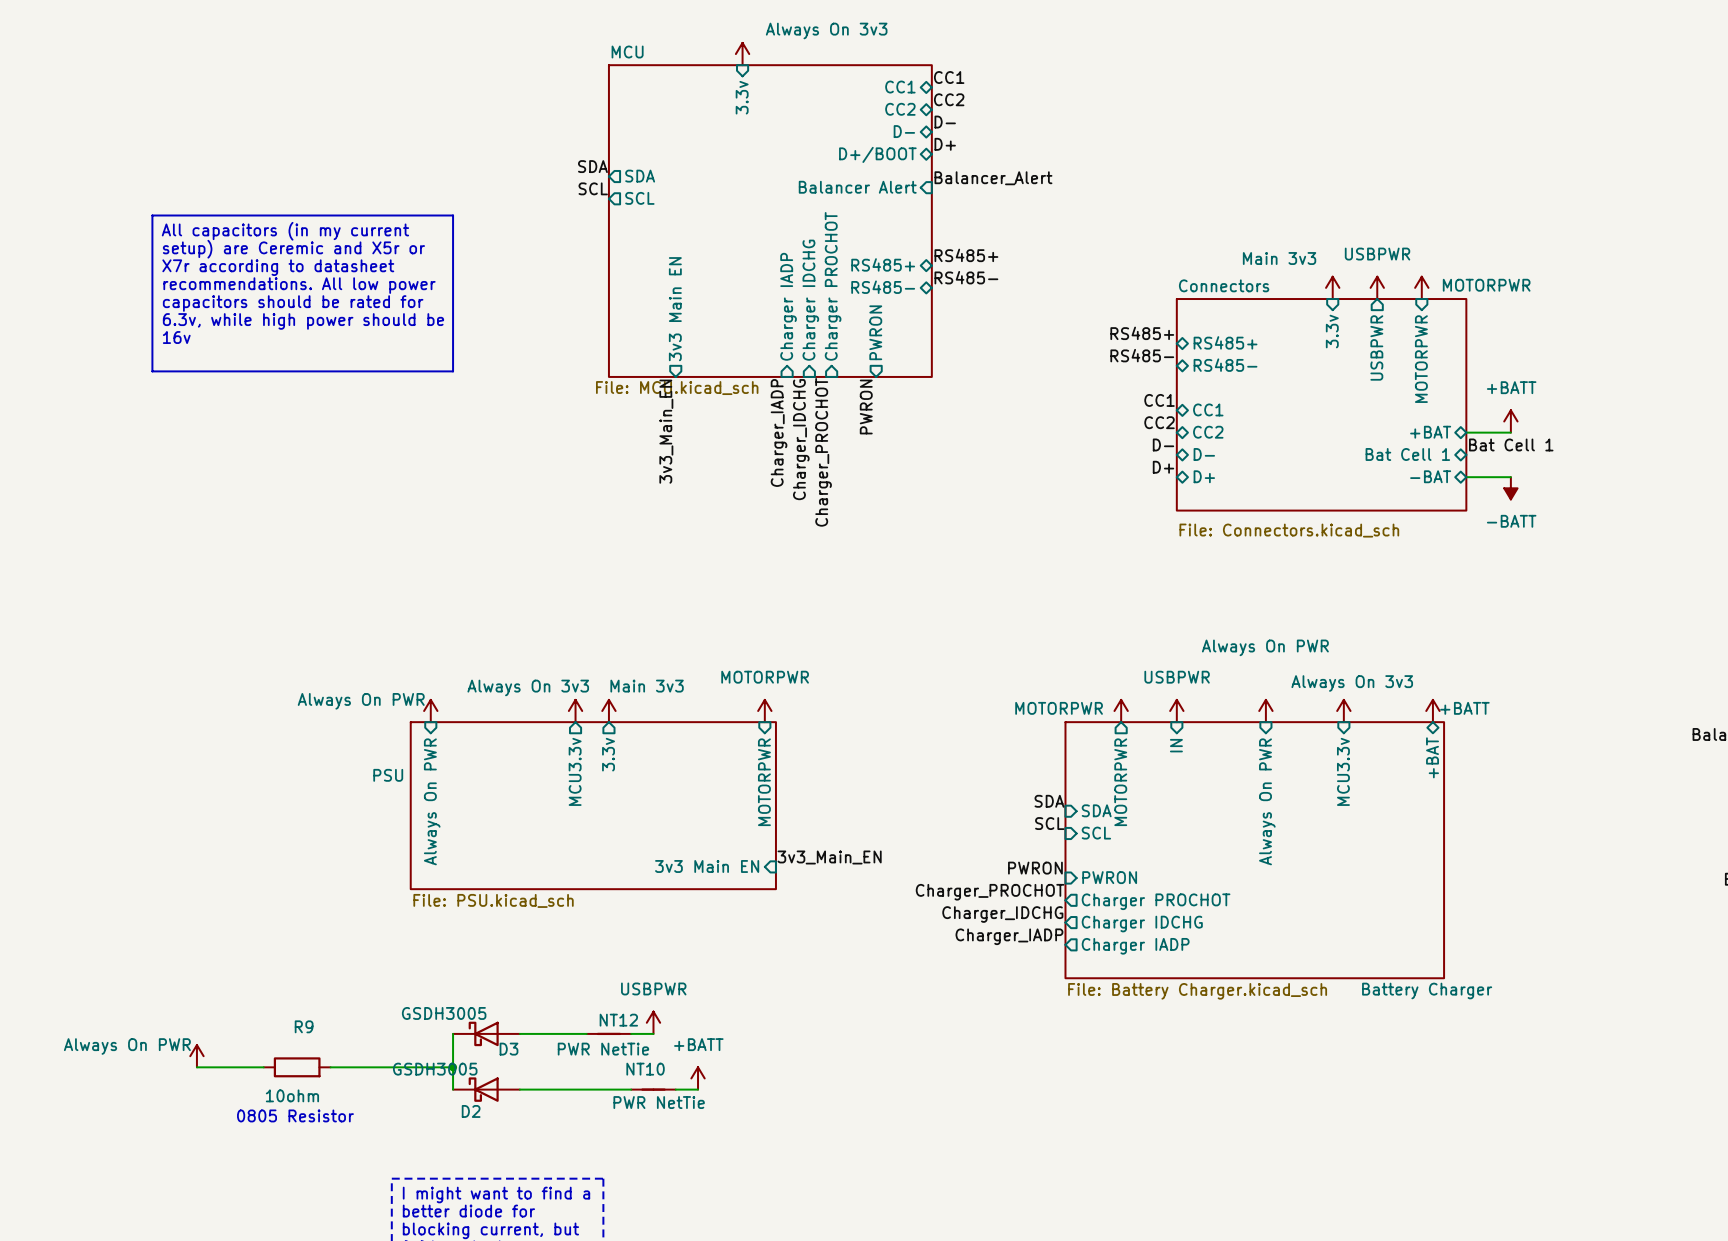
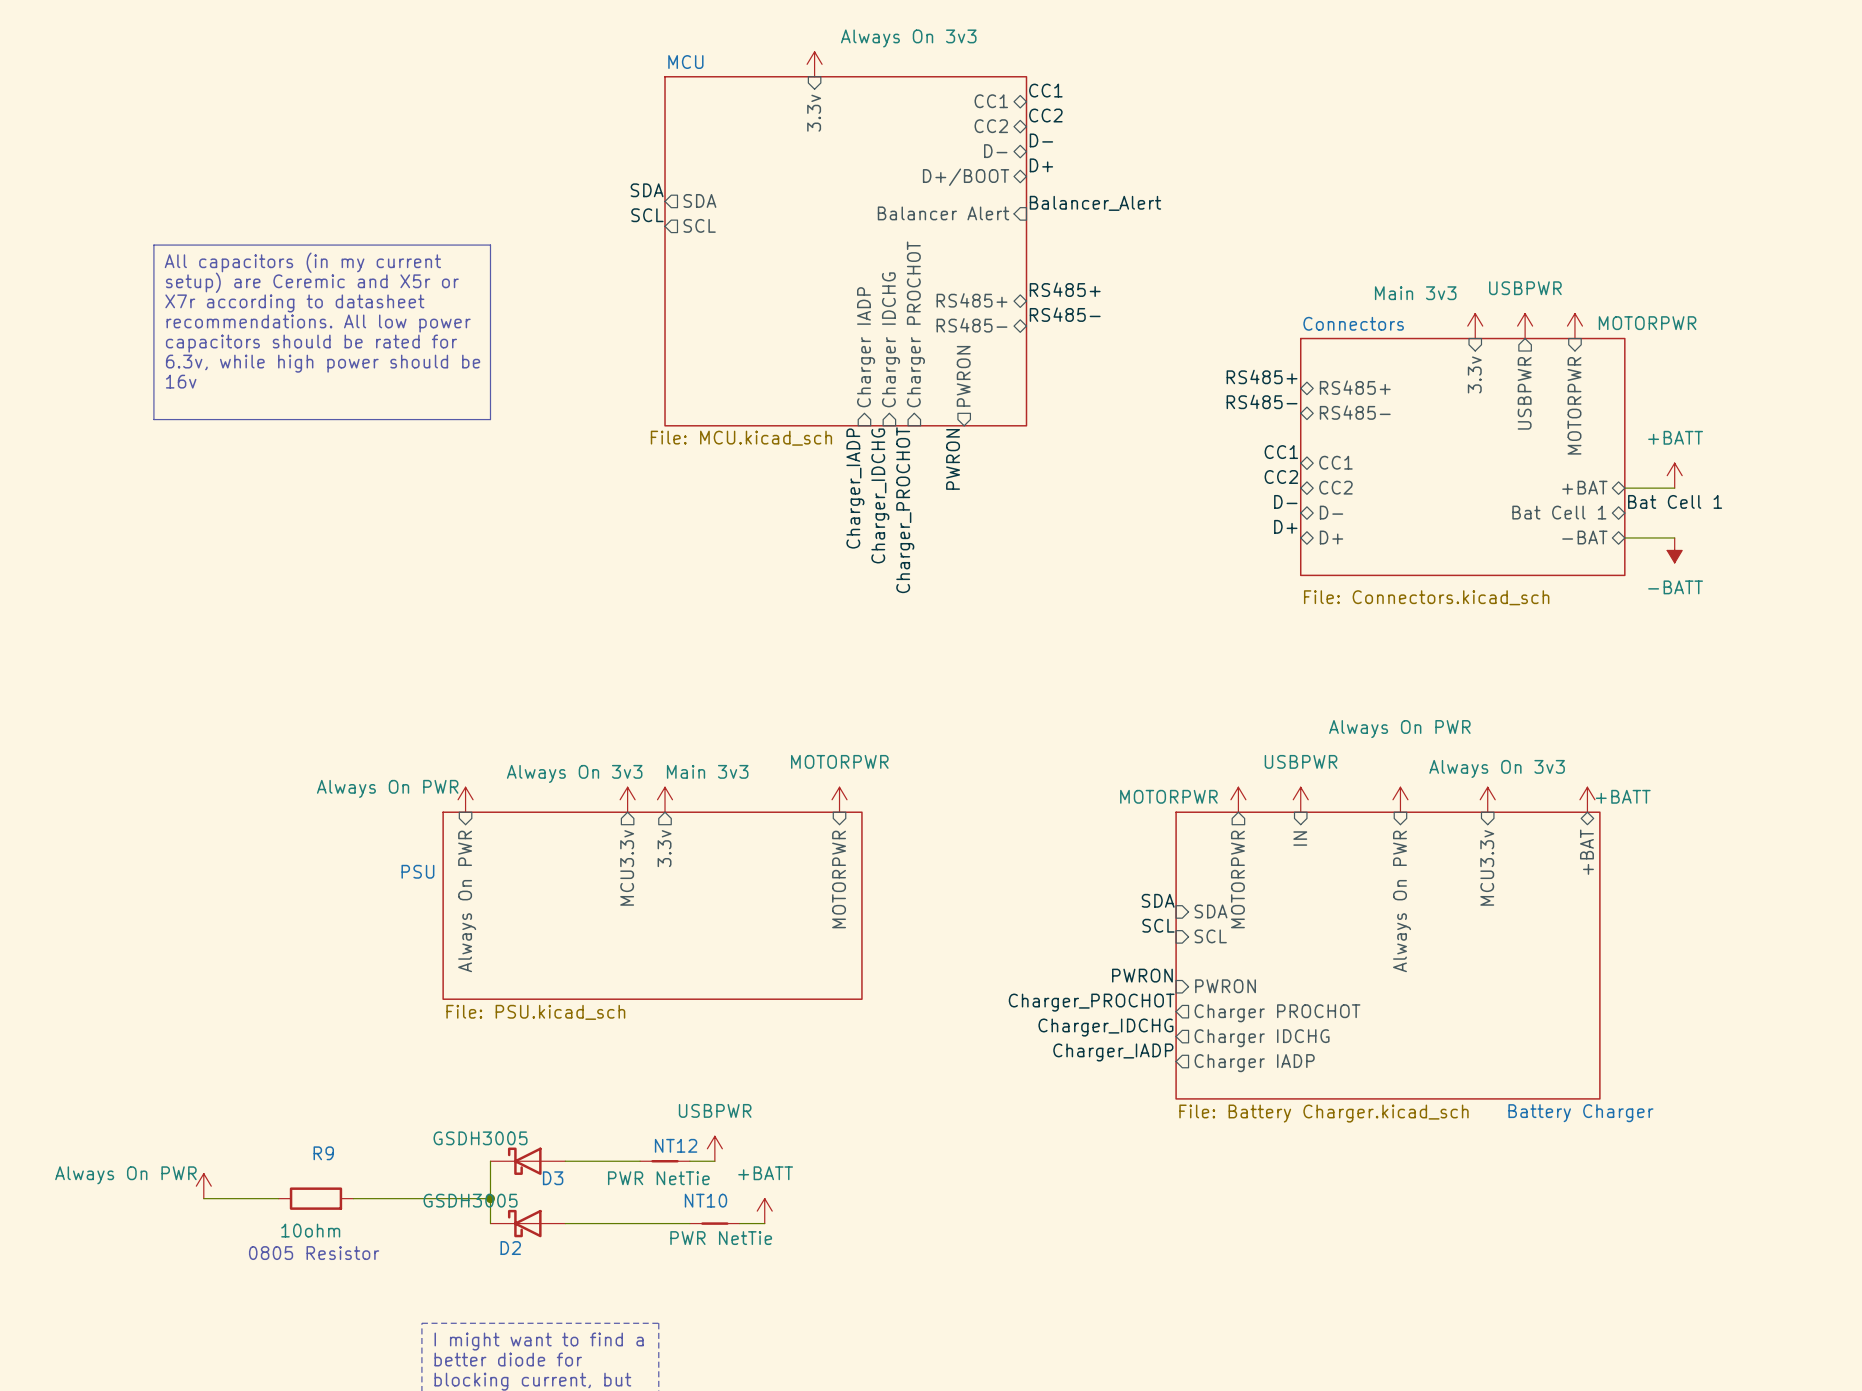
sheet pin: 3v3 Main EN (675, 309) -> none
label: 3v3_Main_EN (666, 431) -> none
sheet PSU shape: [410, 721, 777, 890] -> [442, 811, 863, 1000]
label: 3v3_Main_EN (829, 857) -> none
sheet pin: 3v3 Main EN (707, 866) -> none

